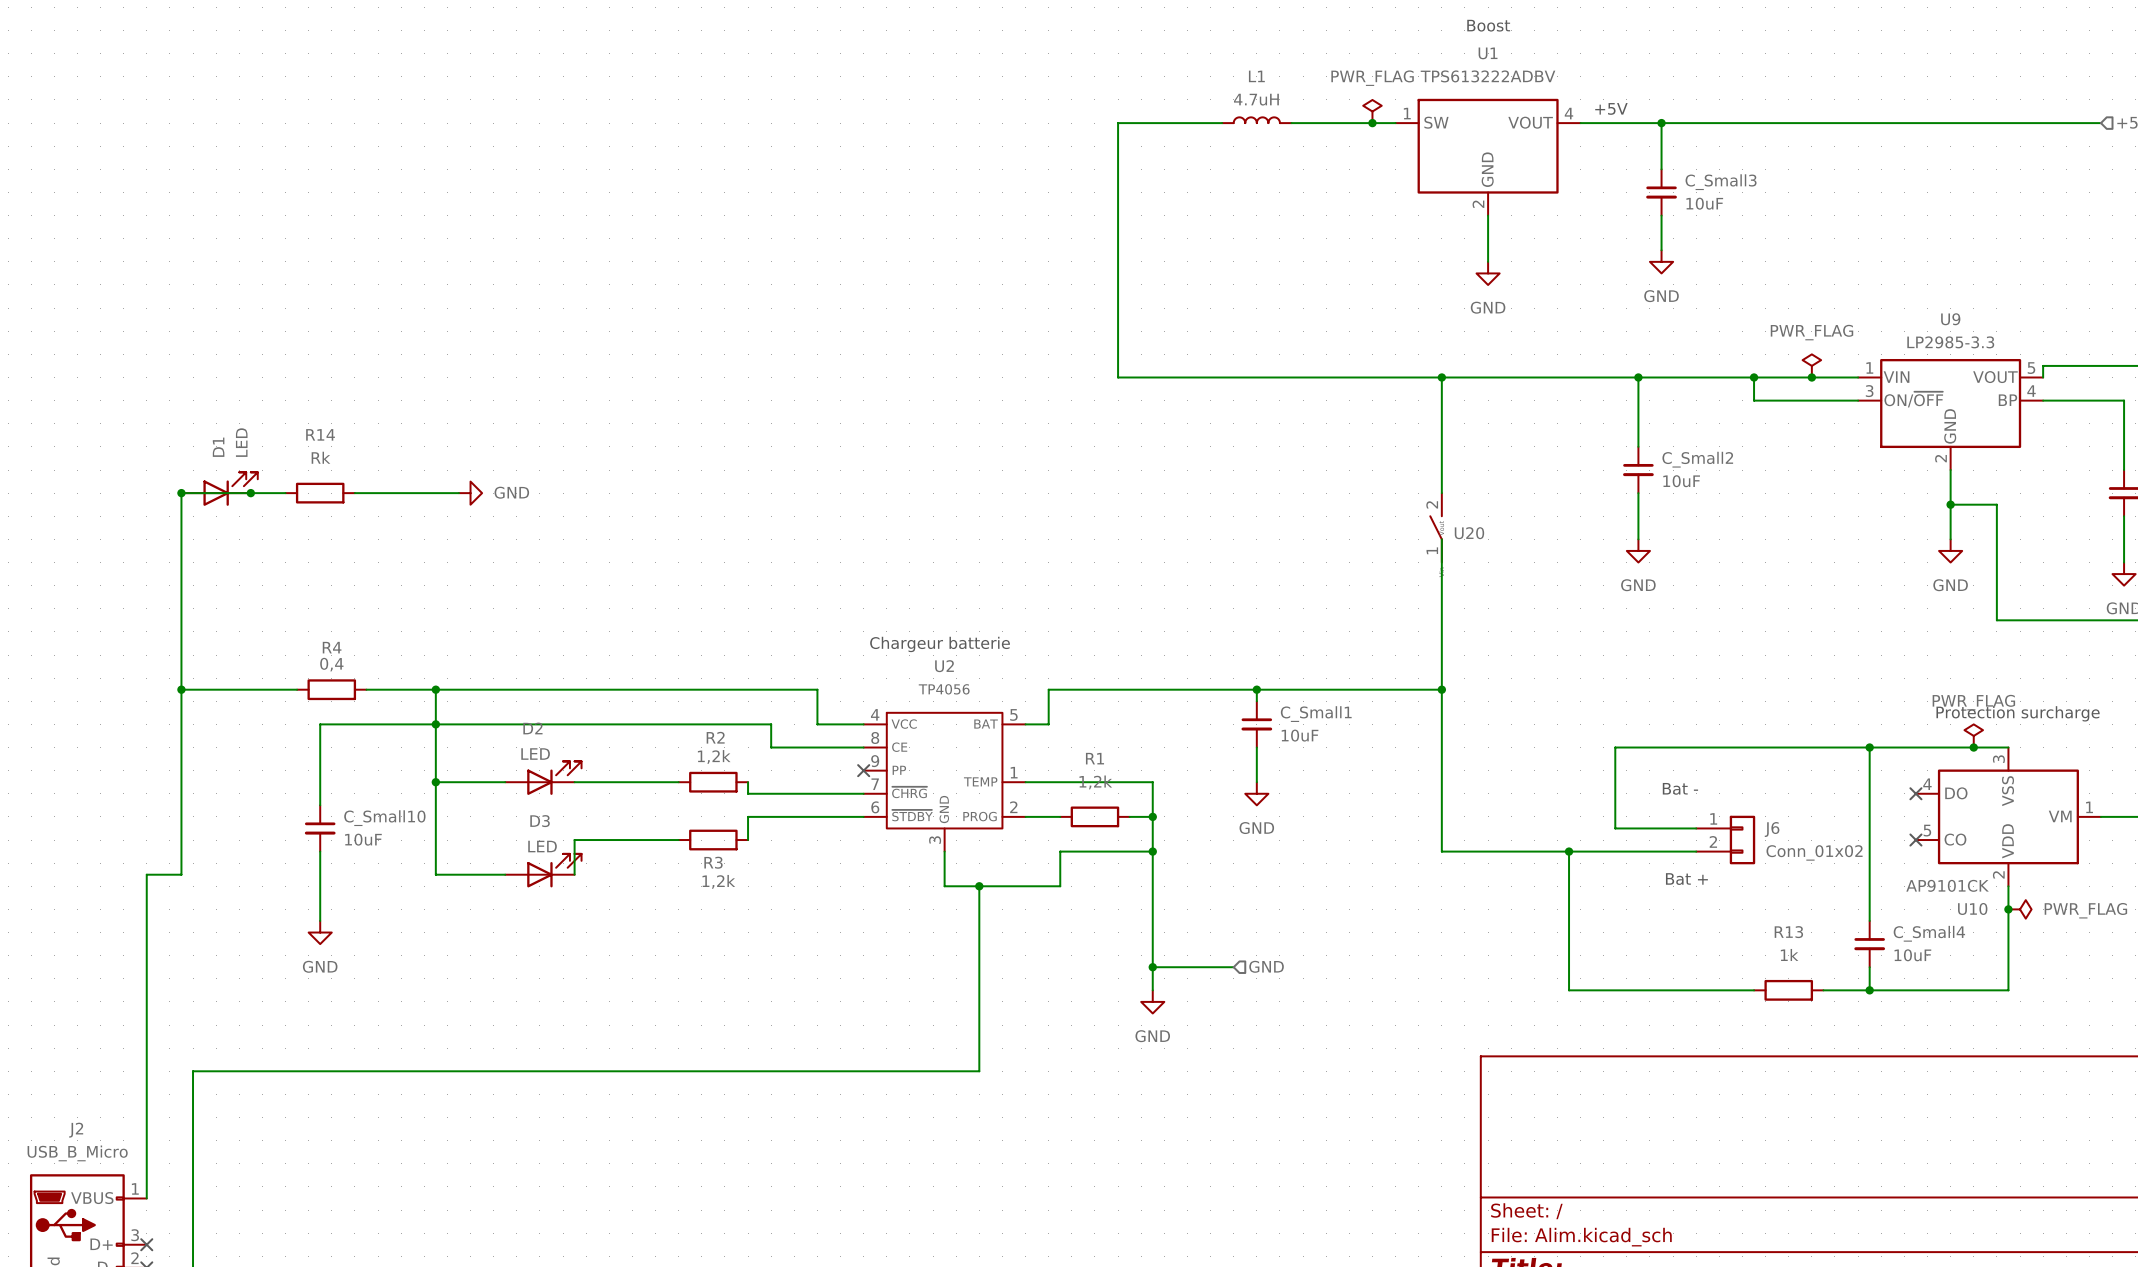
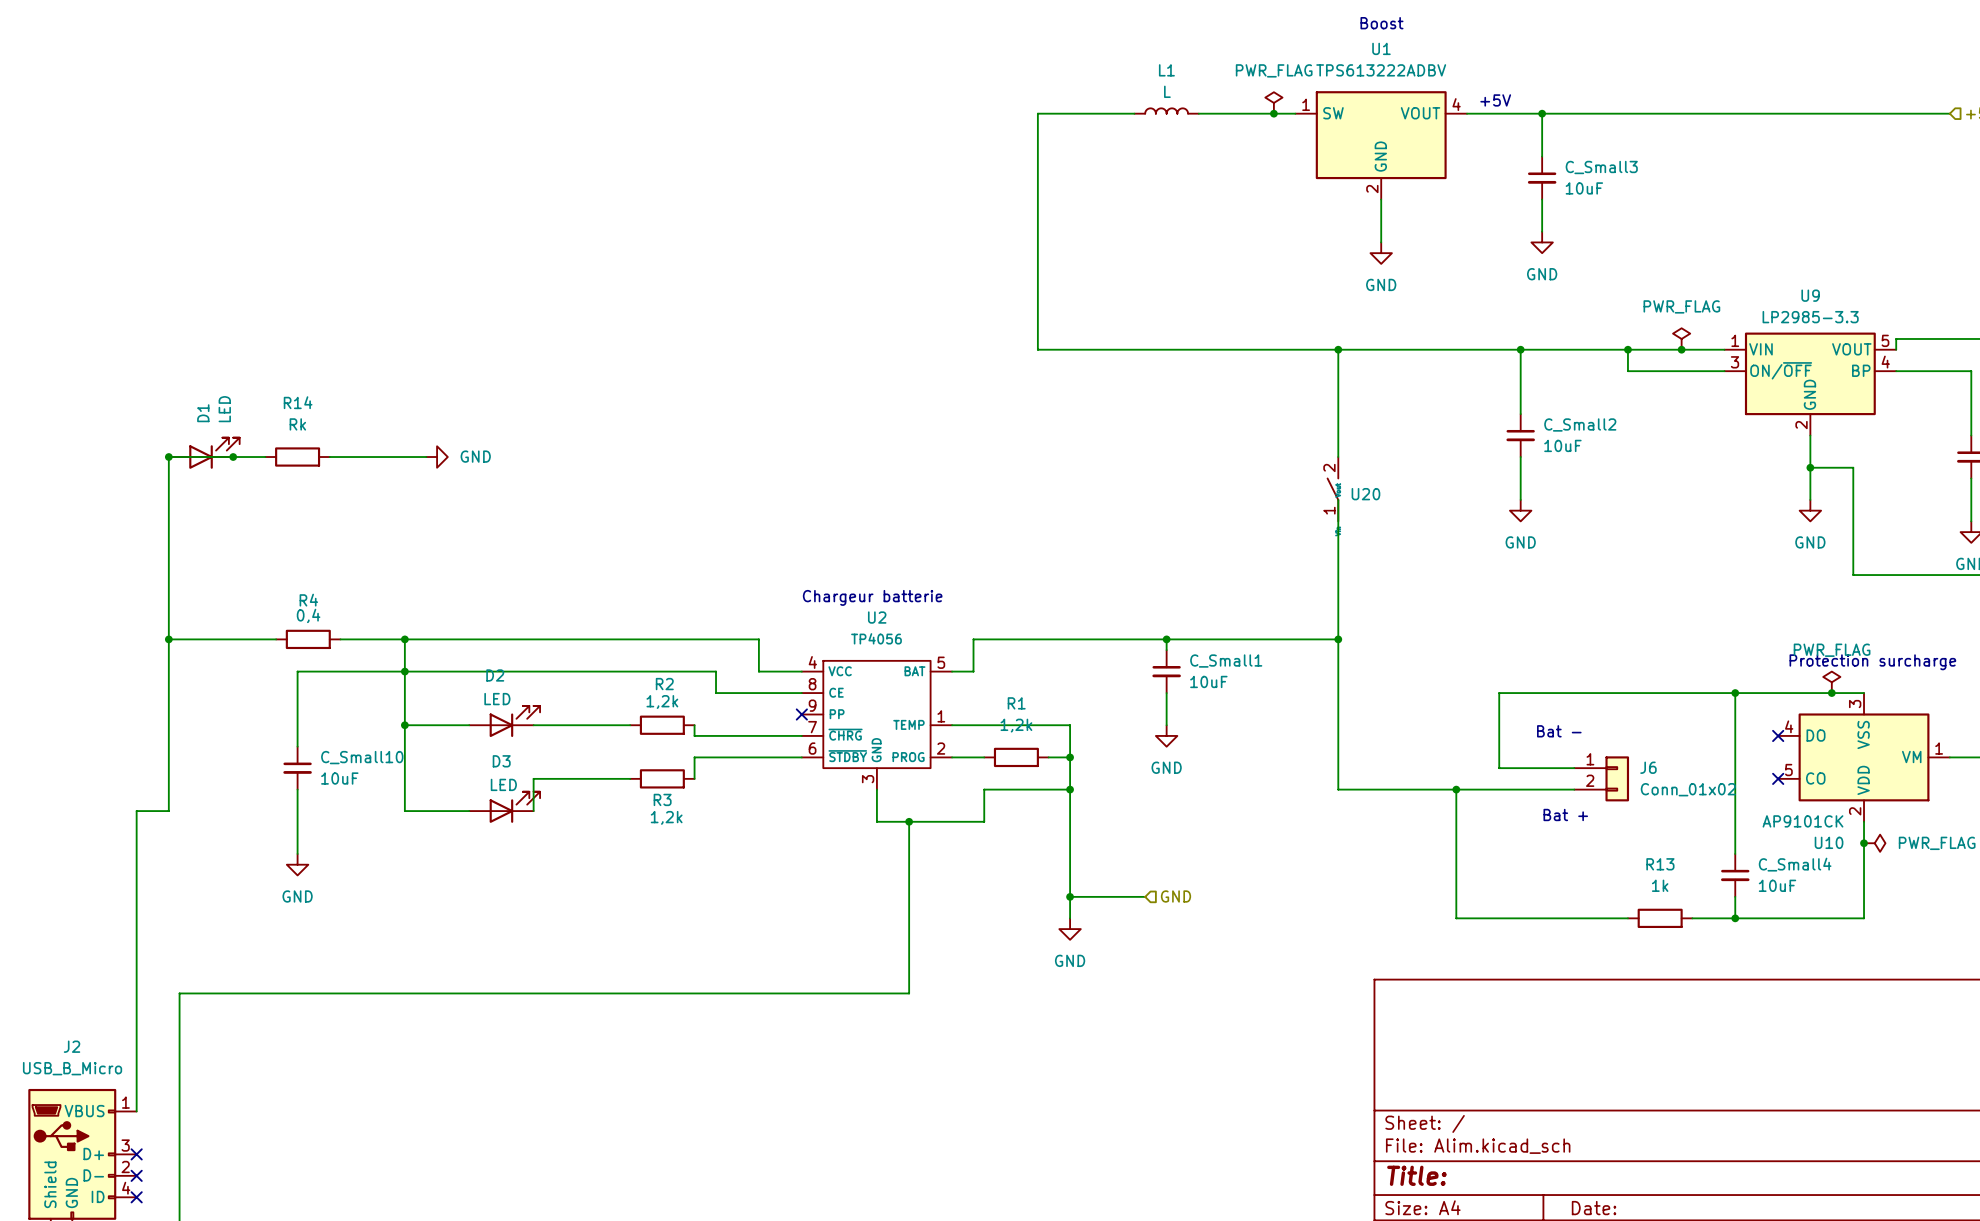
L1 value: 4.7uH (1256, 99) -> L (1167, 91)

